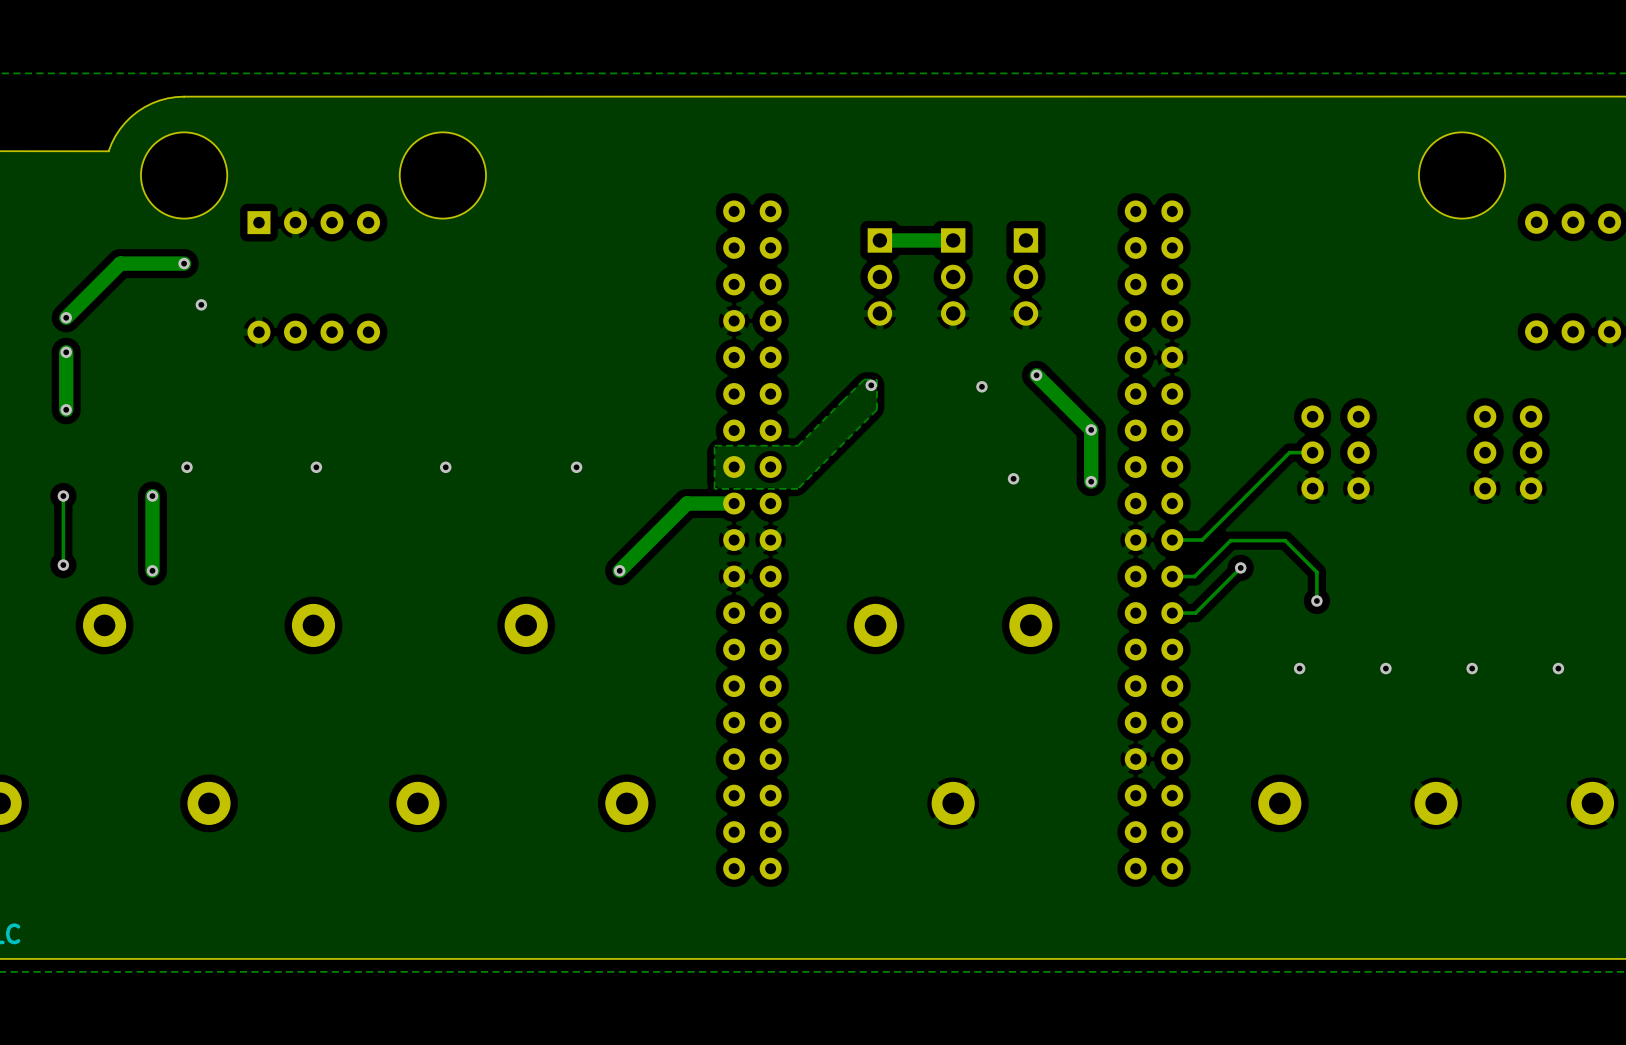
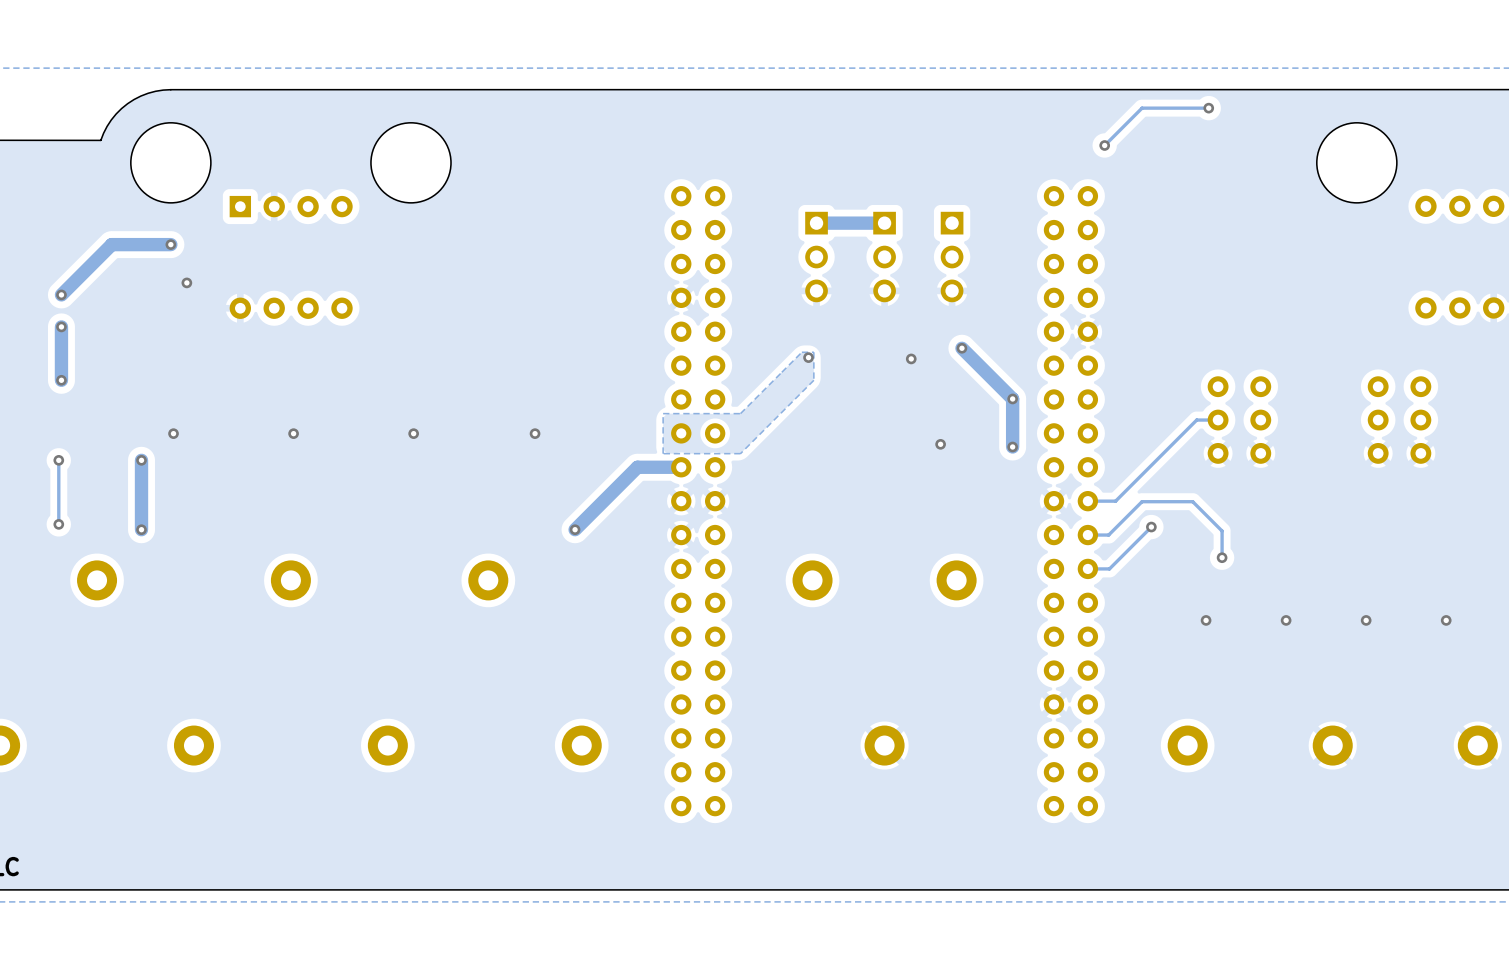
track: none -> (1208, 108) (1142, 108) (1104, 145)
via: none -> (1208, 108)
via: none -> (1104, 145)

